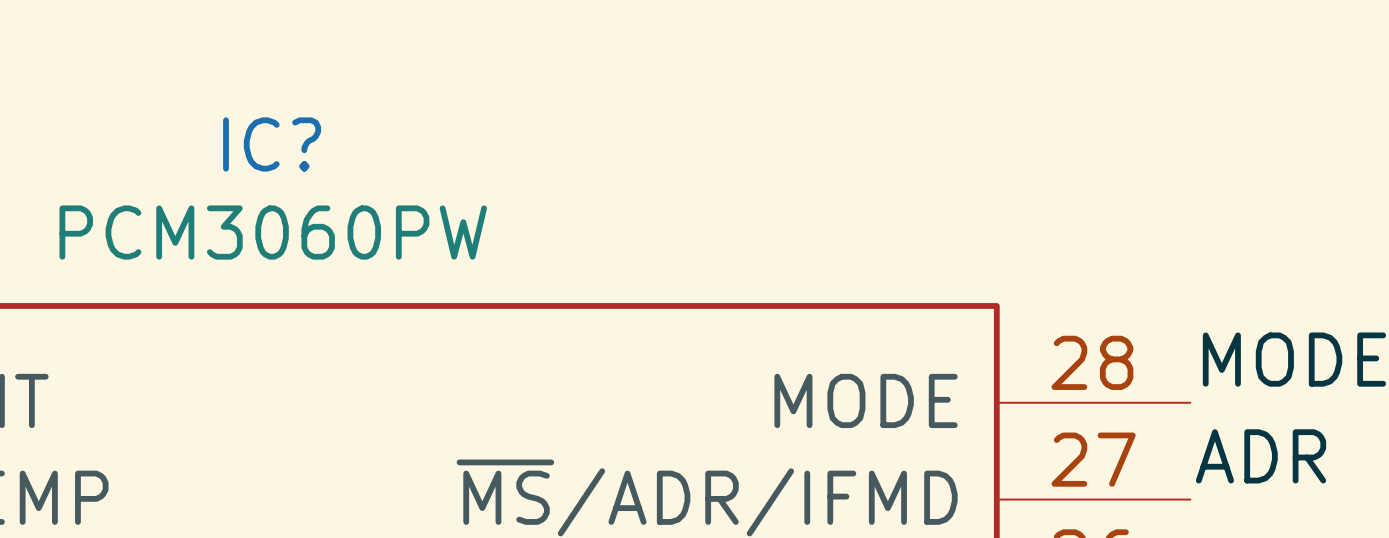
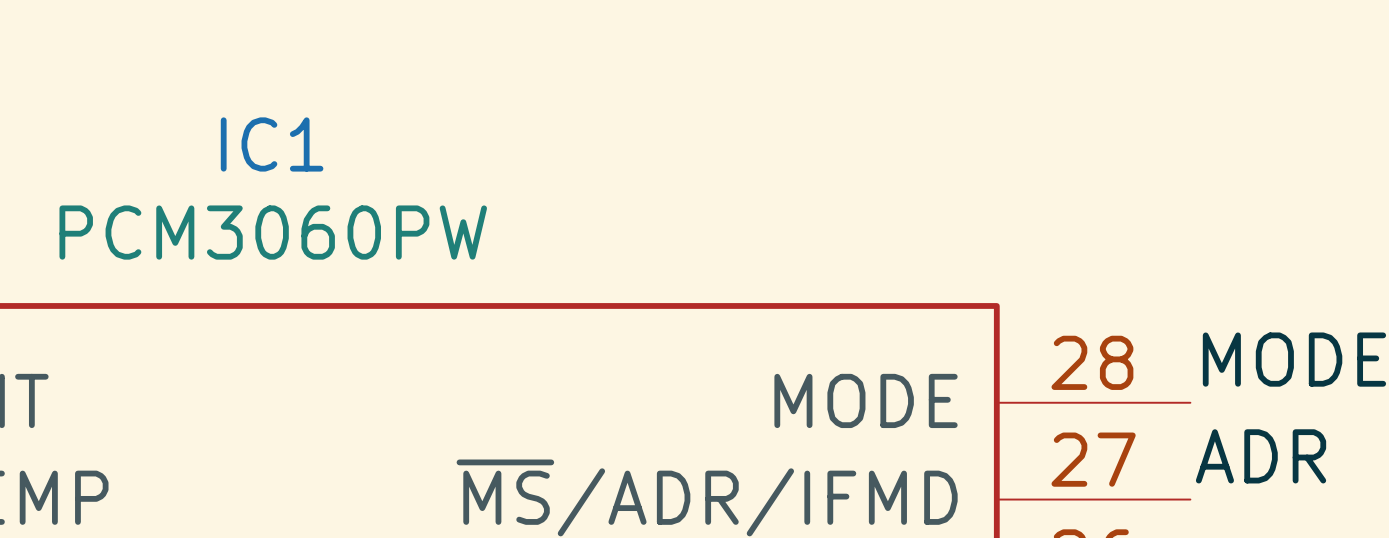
IC? name: IC? (272, 144) -> IC1 (272, 144)

